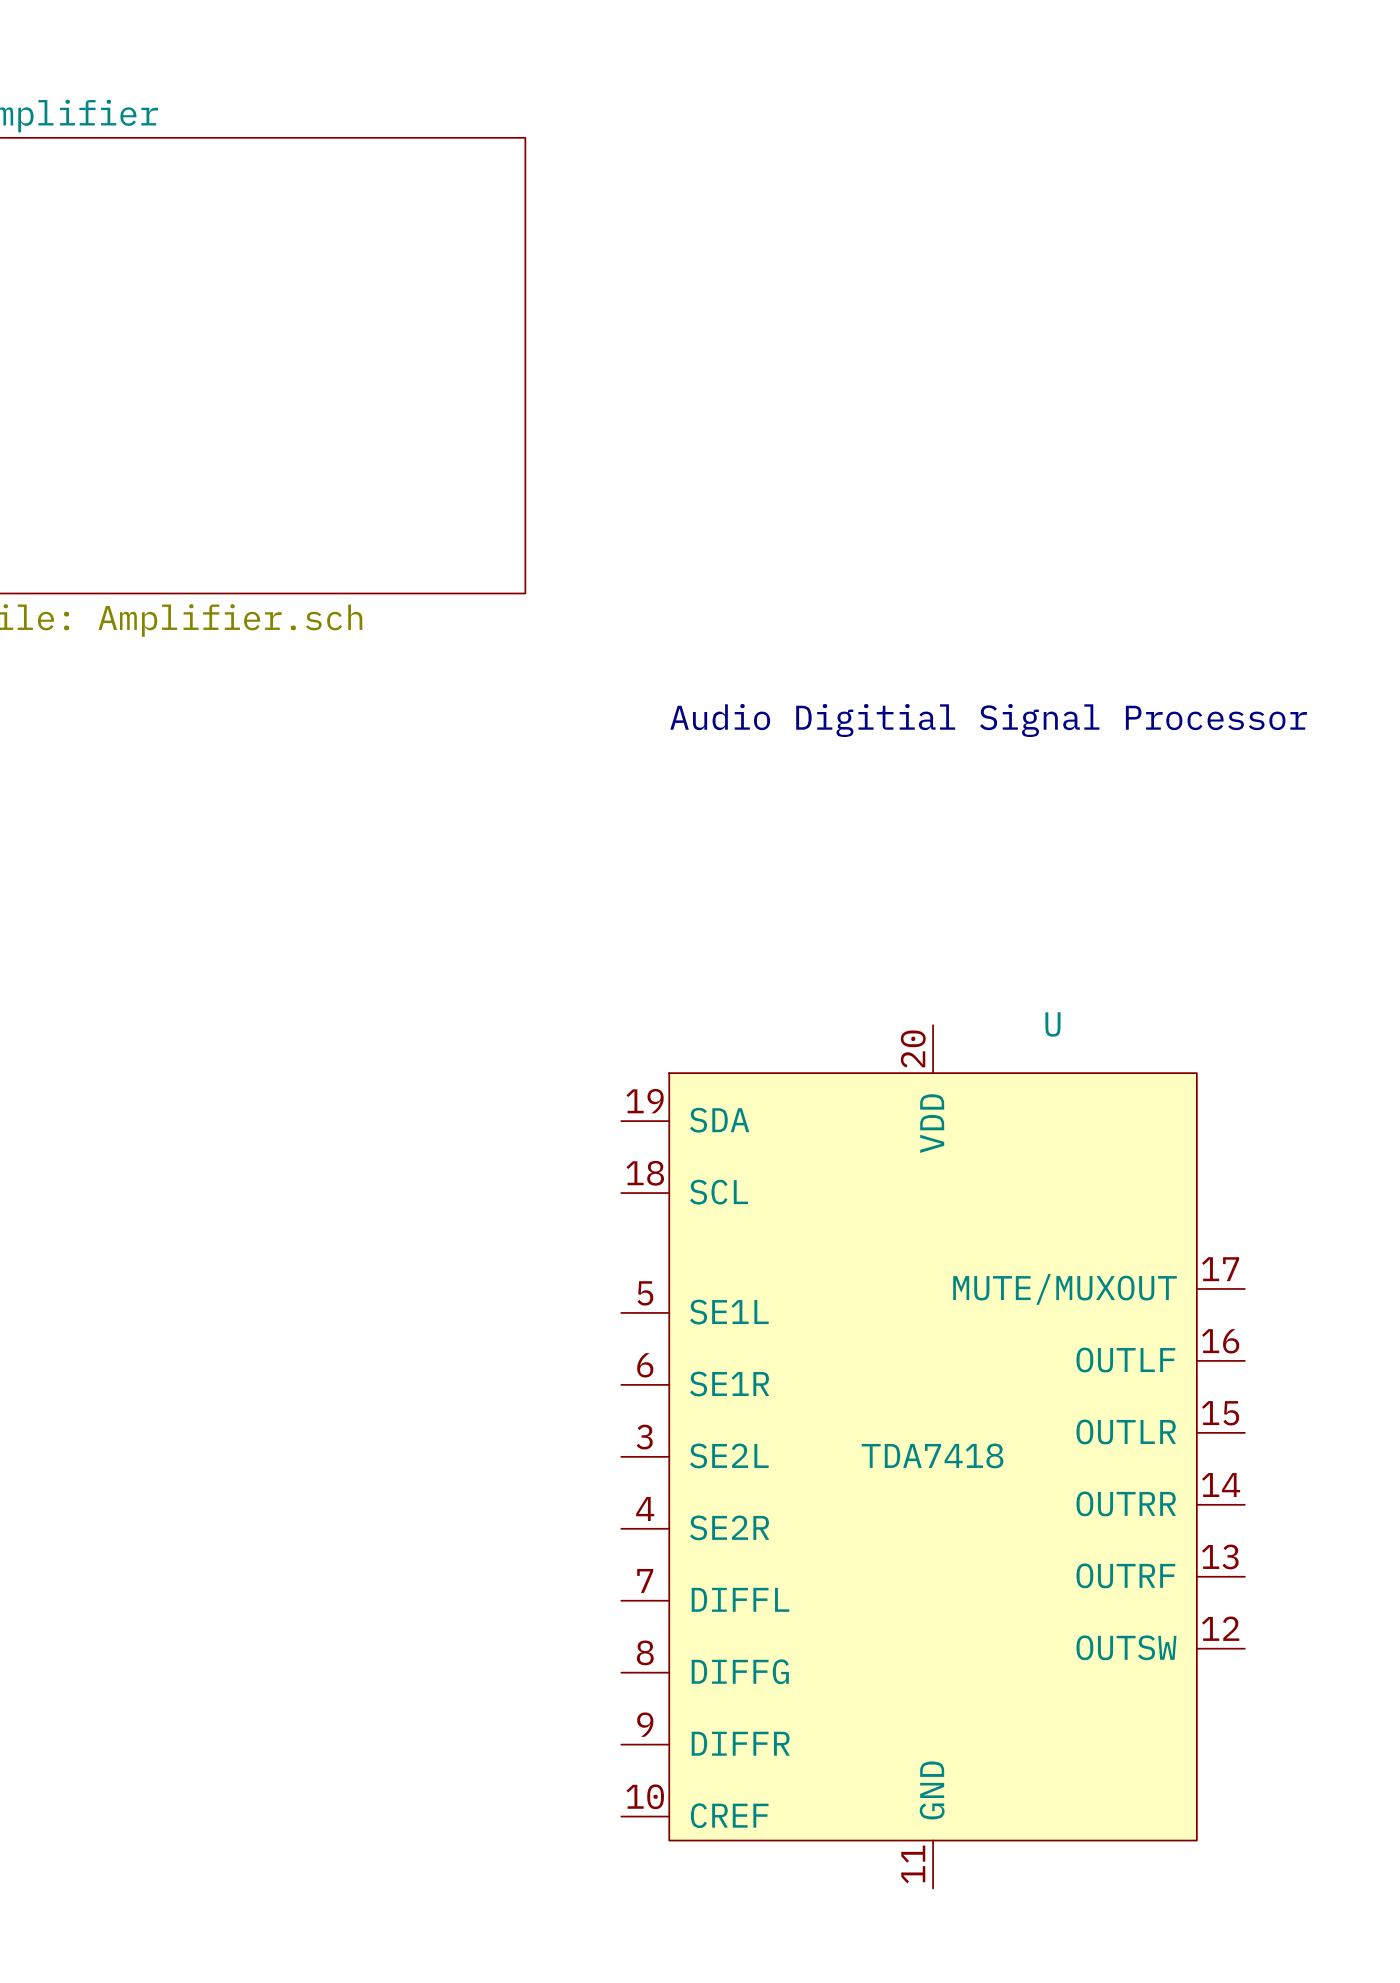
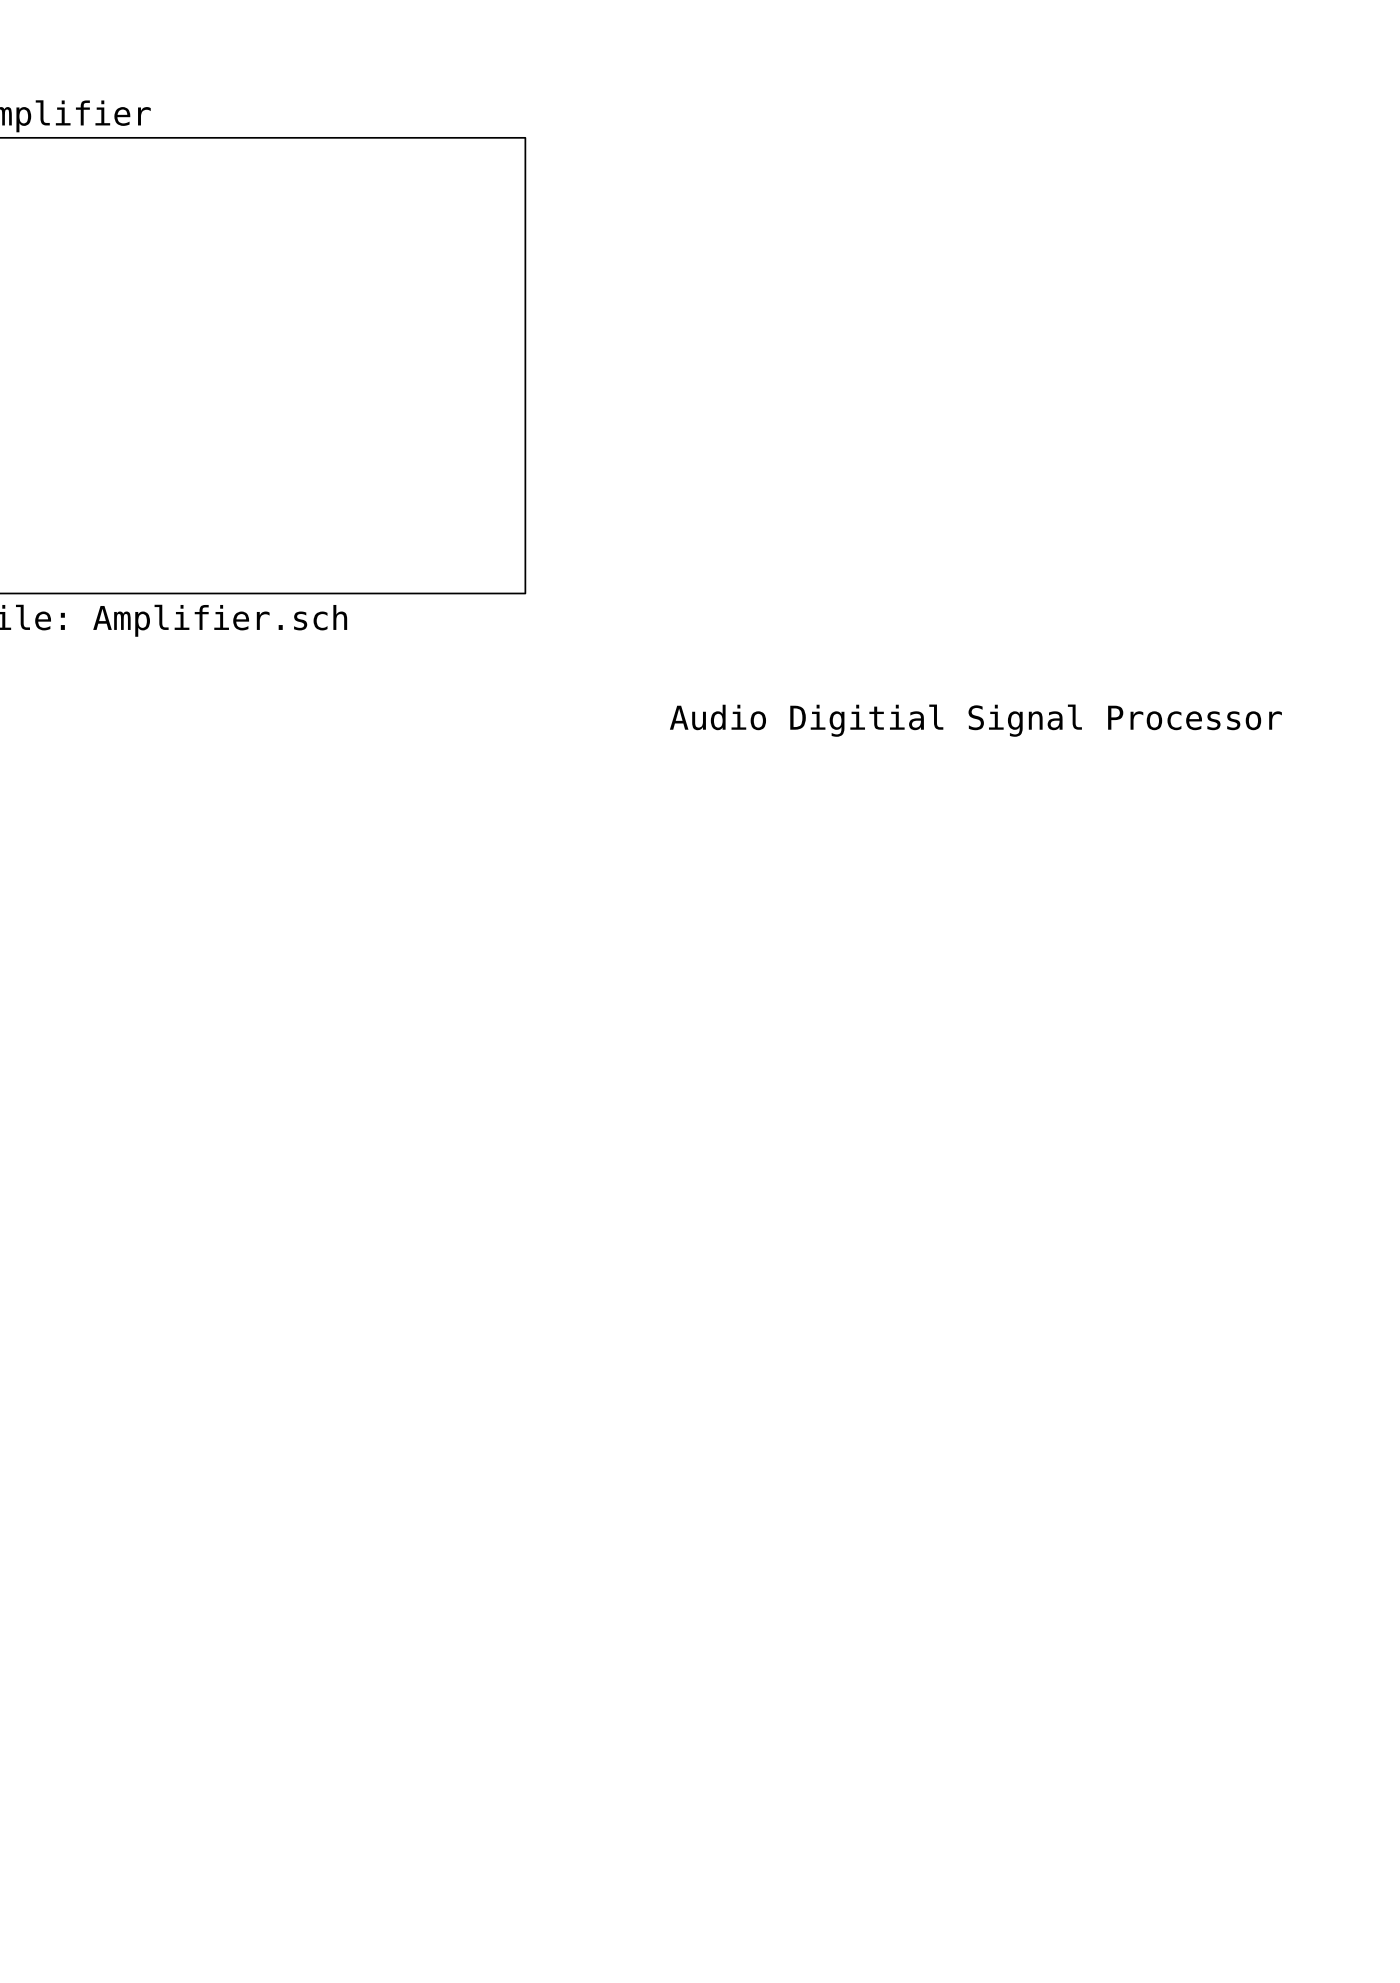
U: TDA7418 (933, 1456) -> none

